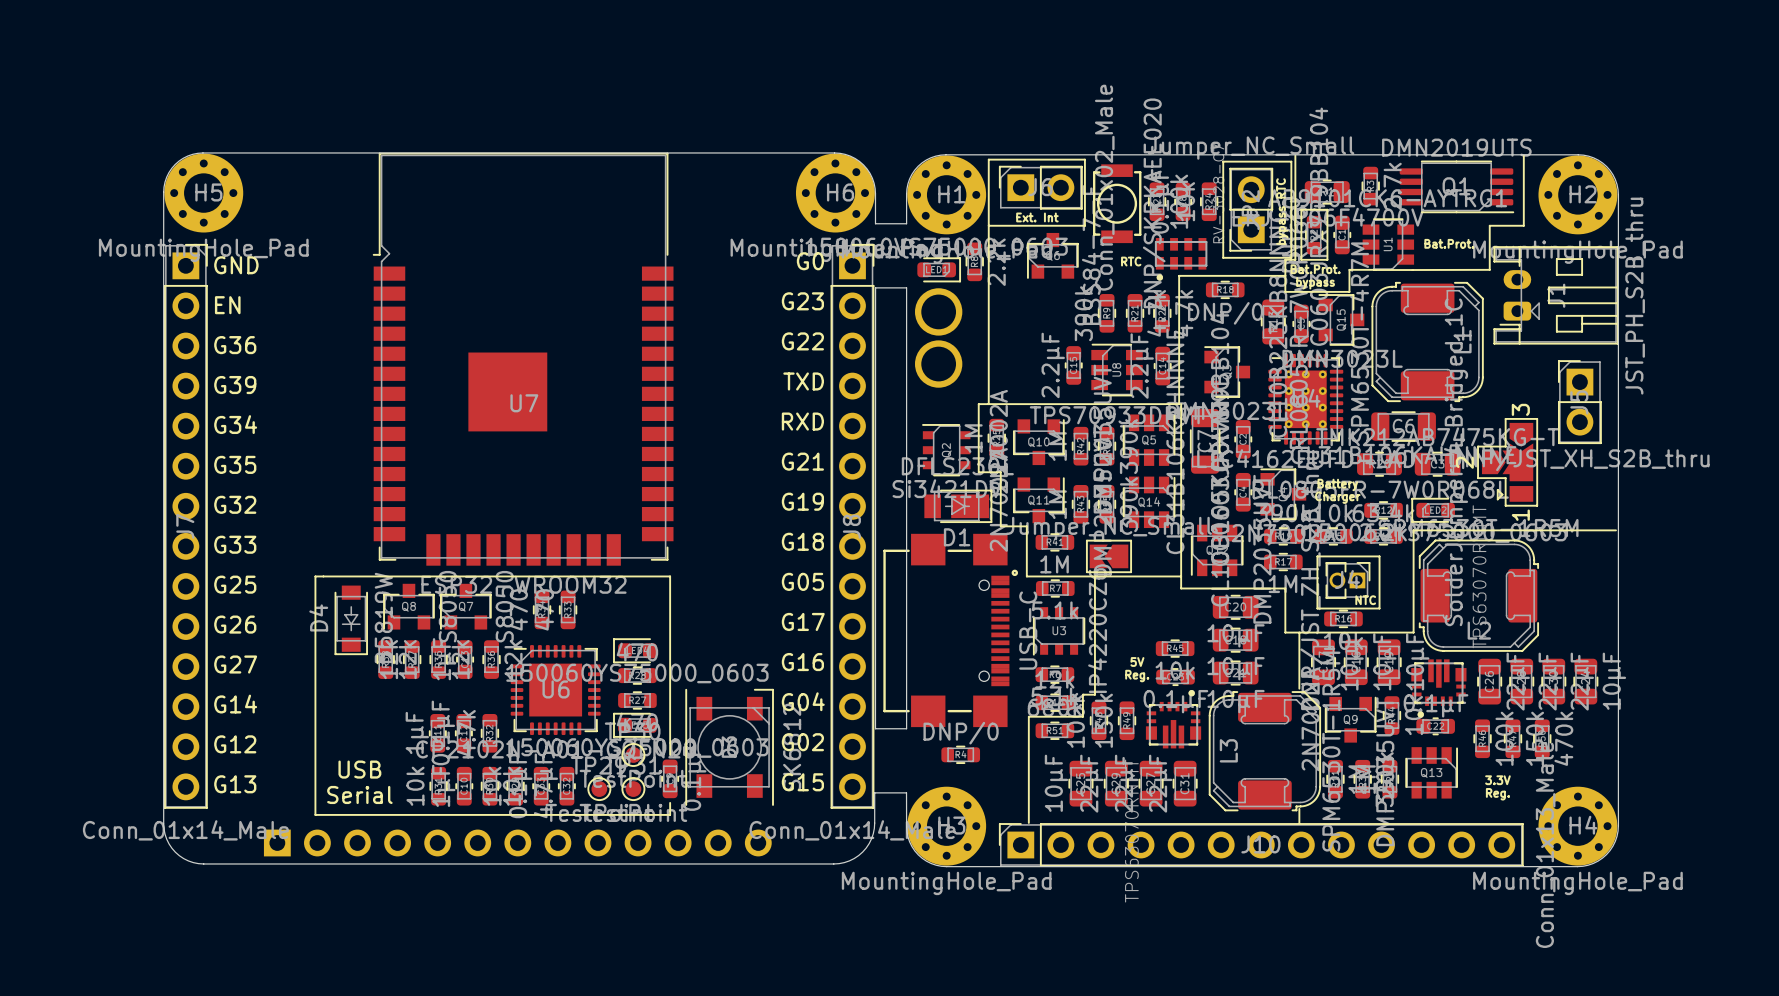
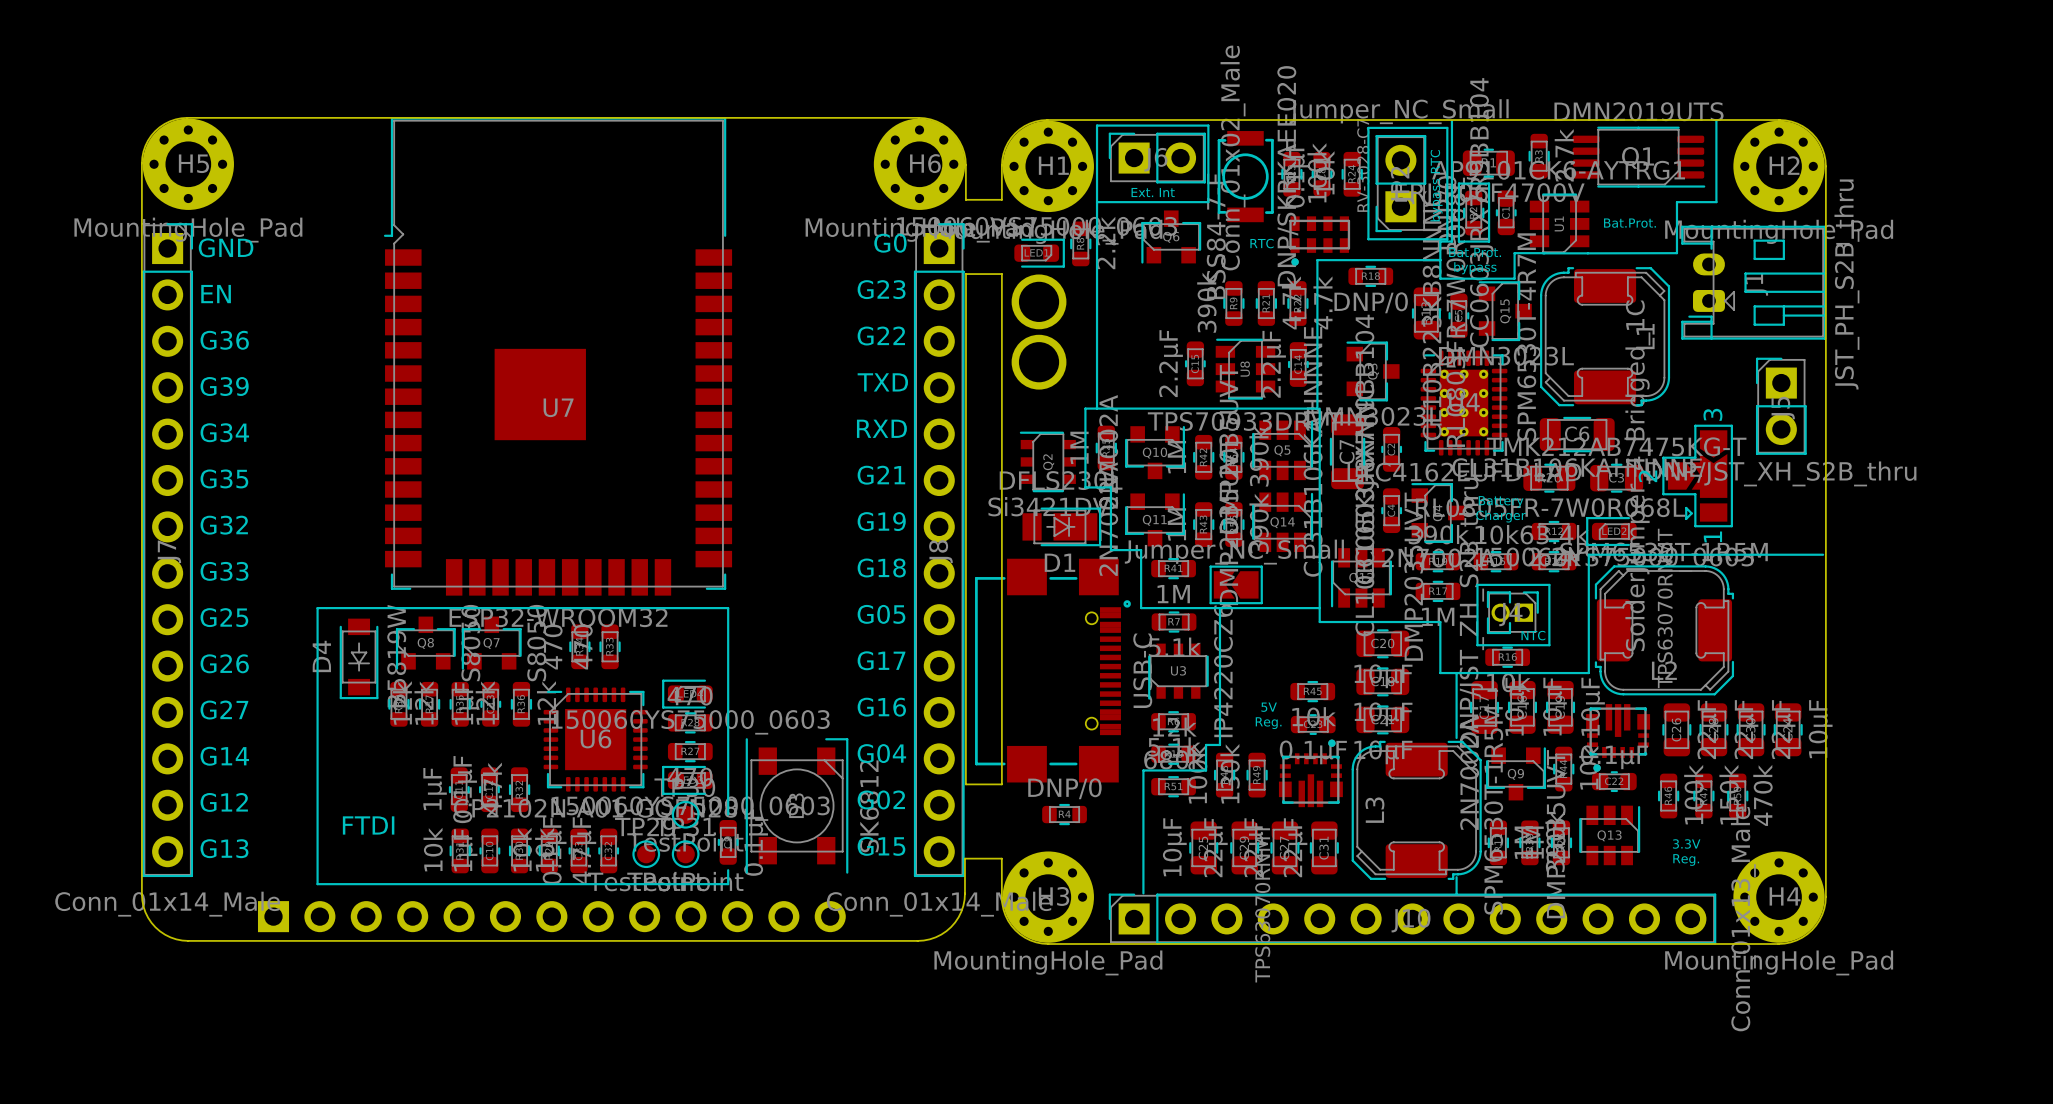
text: USB (359, 769) -> FTDI (368, 825)
text: Serial (359, 794) -> none

